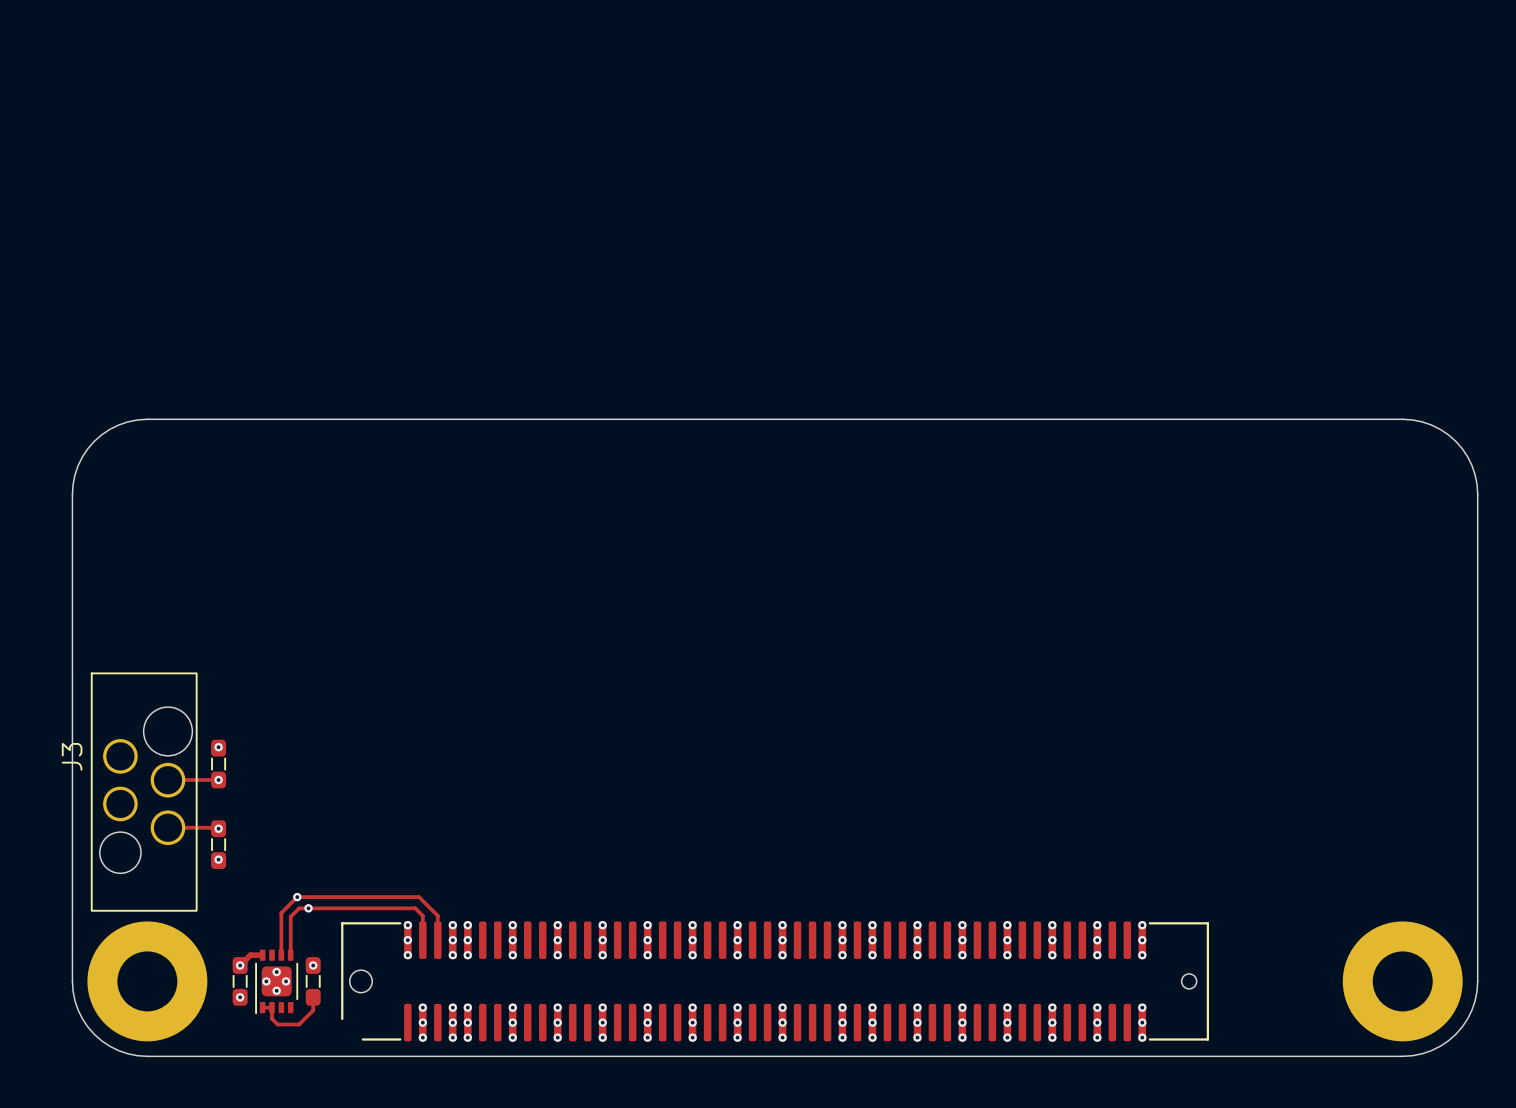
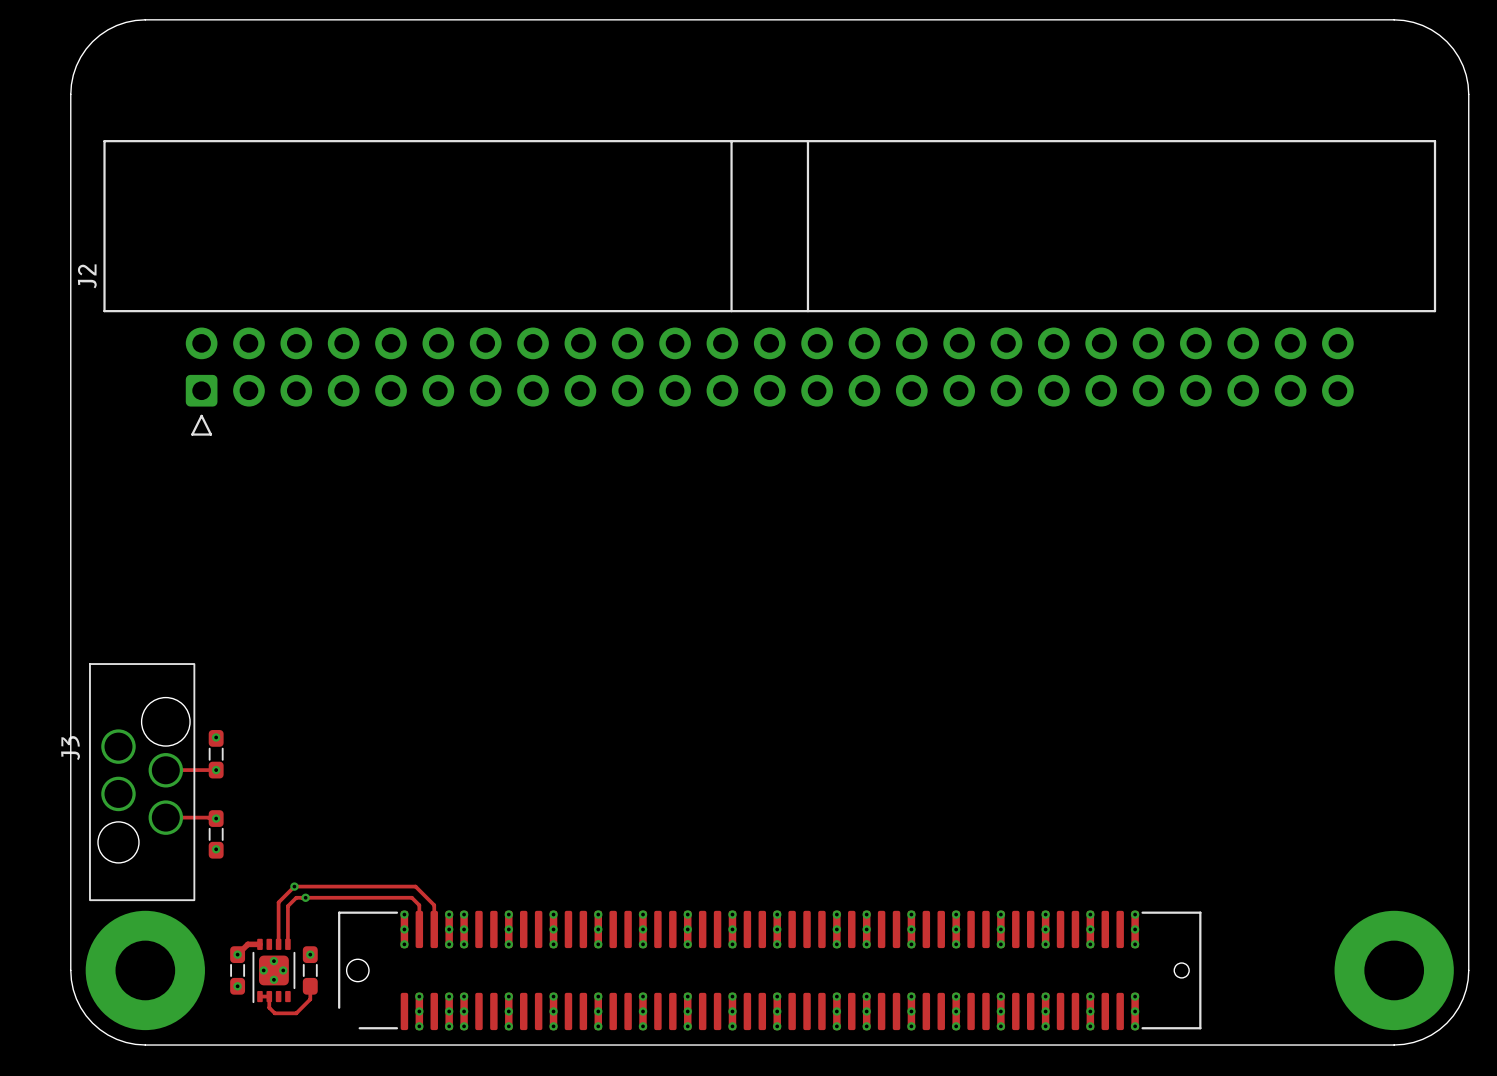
J2: none -> (769, 287)
board edge: (72, 494) (78, 465) (94, 441) (118, 425) (147, 419) (1402, 419) (1431, 425) (1455, 441) (1471, 465) (1477, 494) -> (70, 485) (71, 84) (80, 57) (92, 41) (116, 25) (145, 19) (1394, 19) (1422, 25) (1439, 35) (1453, 49) (1463, 65) (1468, 84) (1468, 485)

